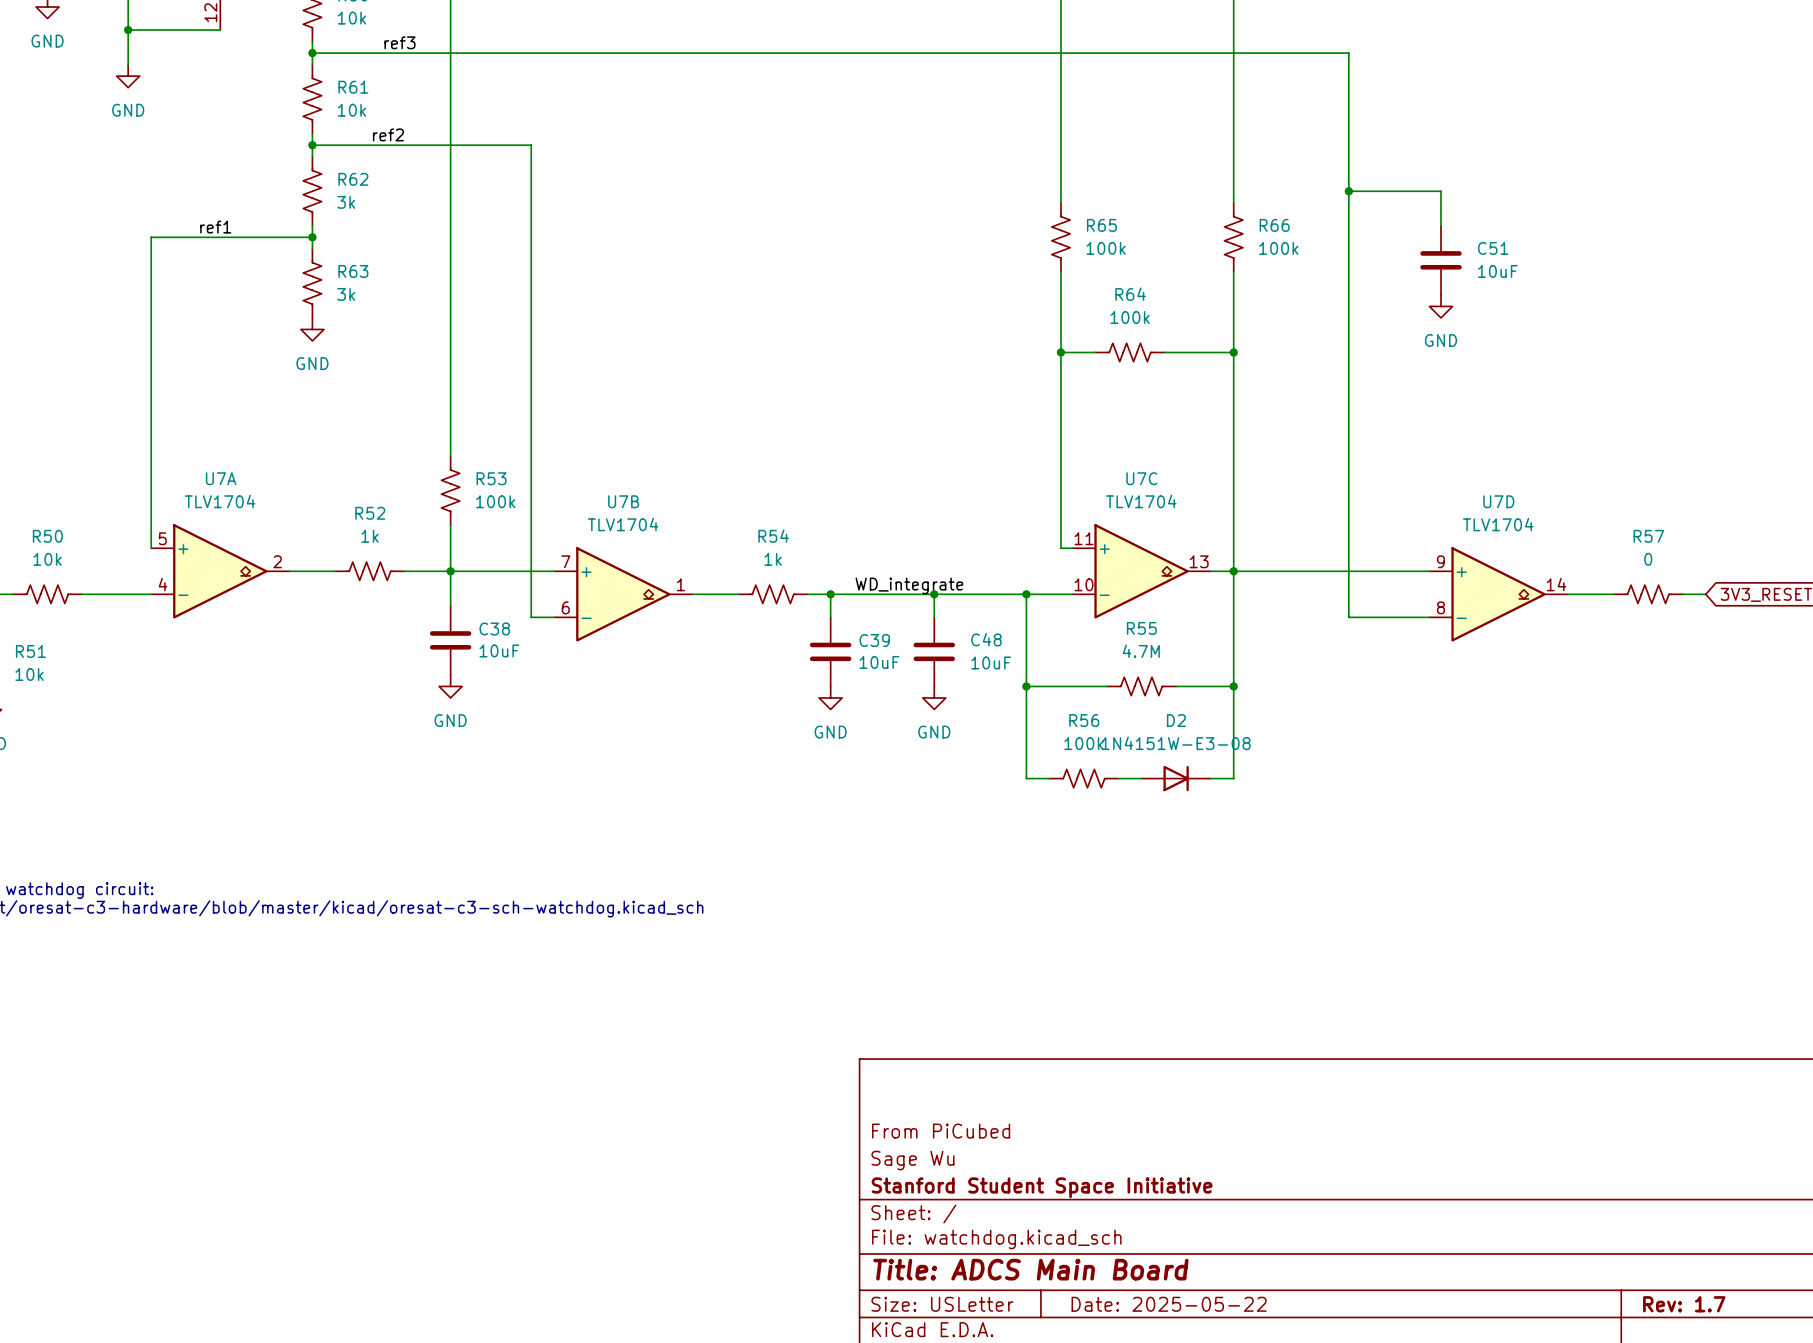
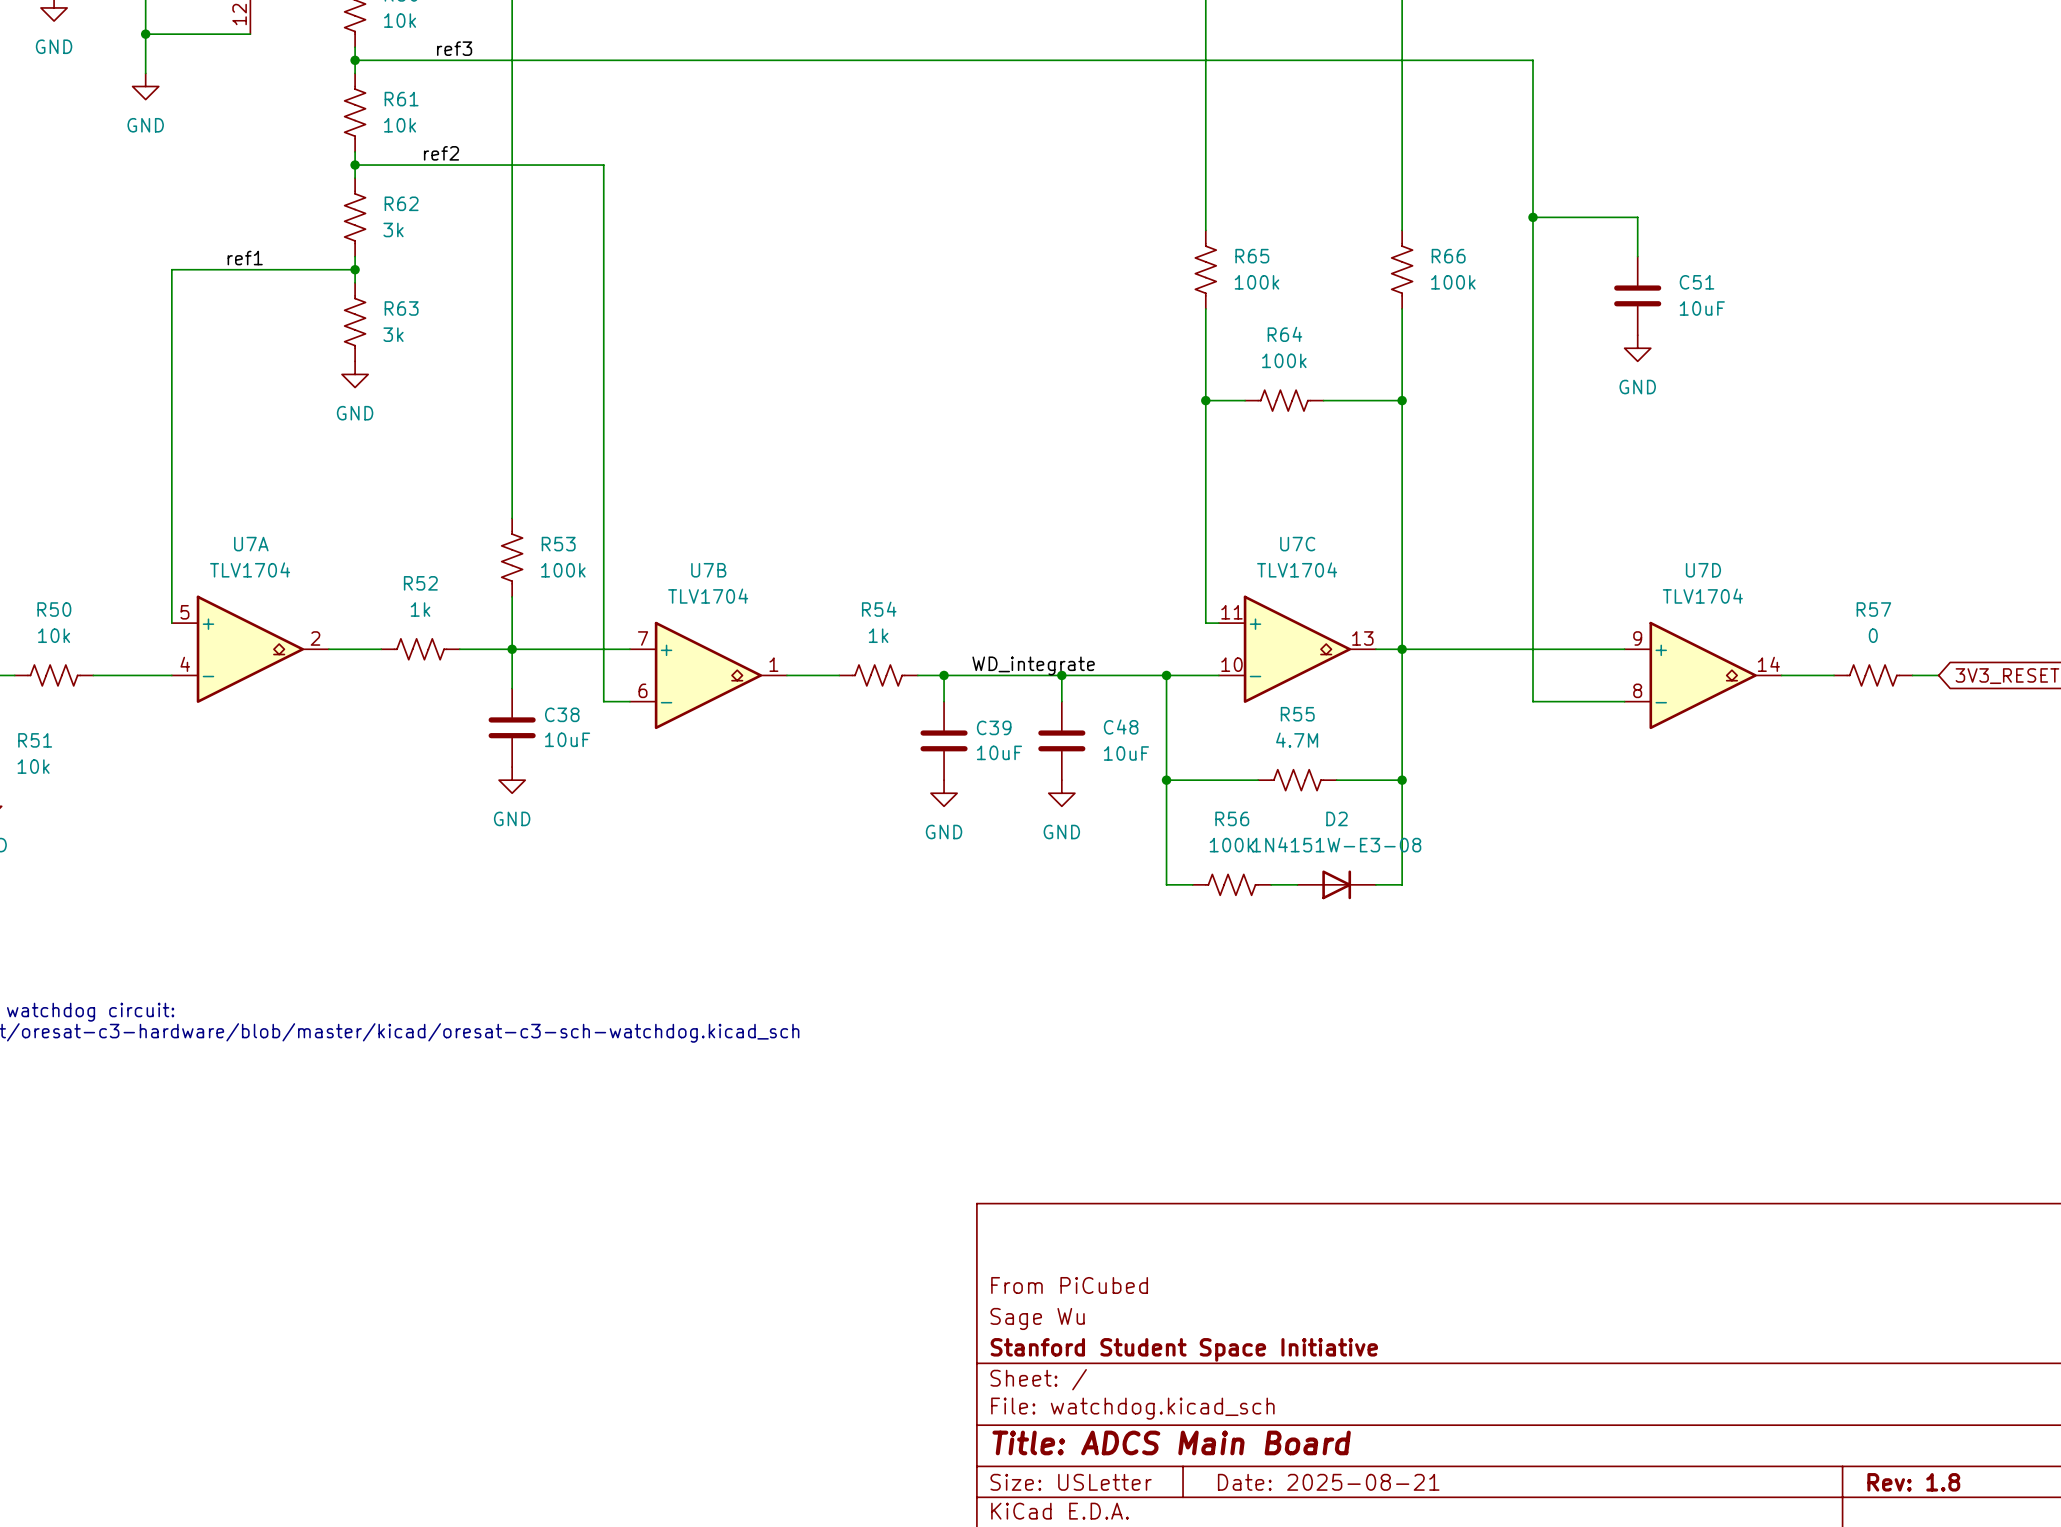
title block: Date: 2025-05-22 (1169, 1304) -> Date: 2025-08-21 (1328, 1482)
title block: Rev: 1.7 (1684, 1304) -> Rev: 1.8 (1913, 1482)

